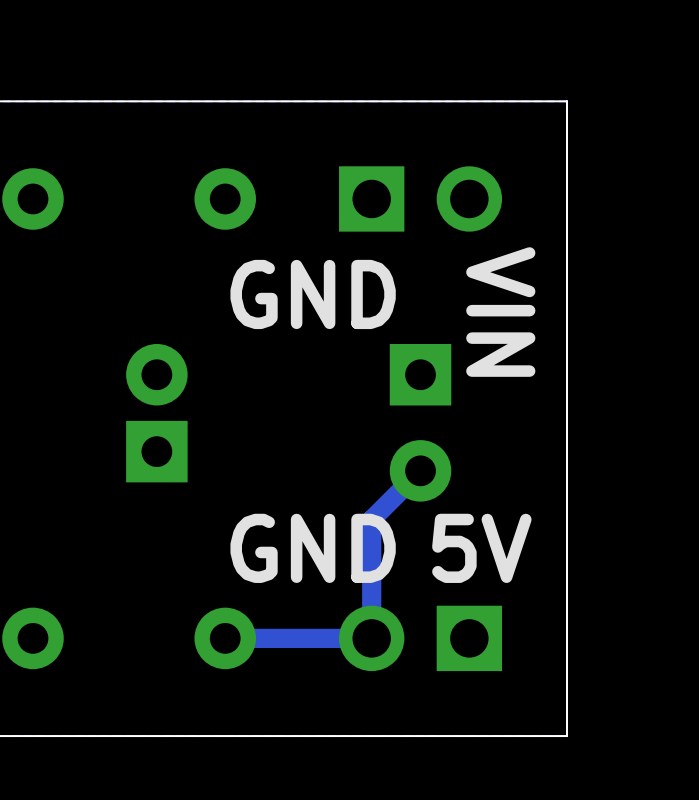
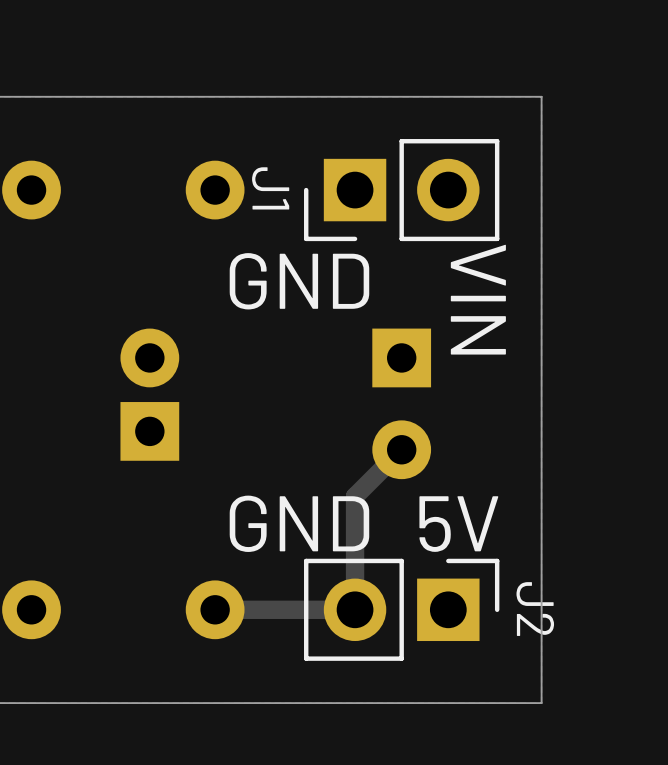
J1 side: top (420, 198) -> bottom (401, 190)
J2 side: top (420, 638) -> bottom (401, 609)

